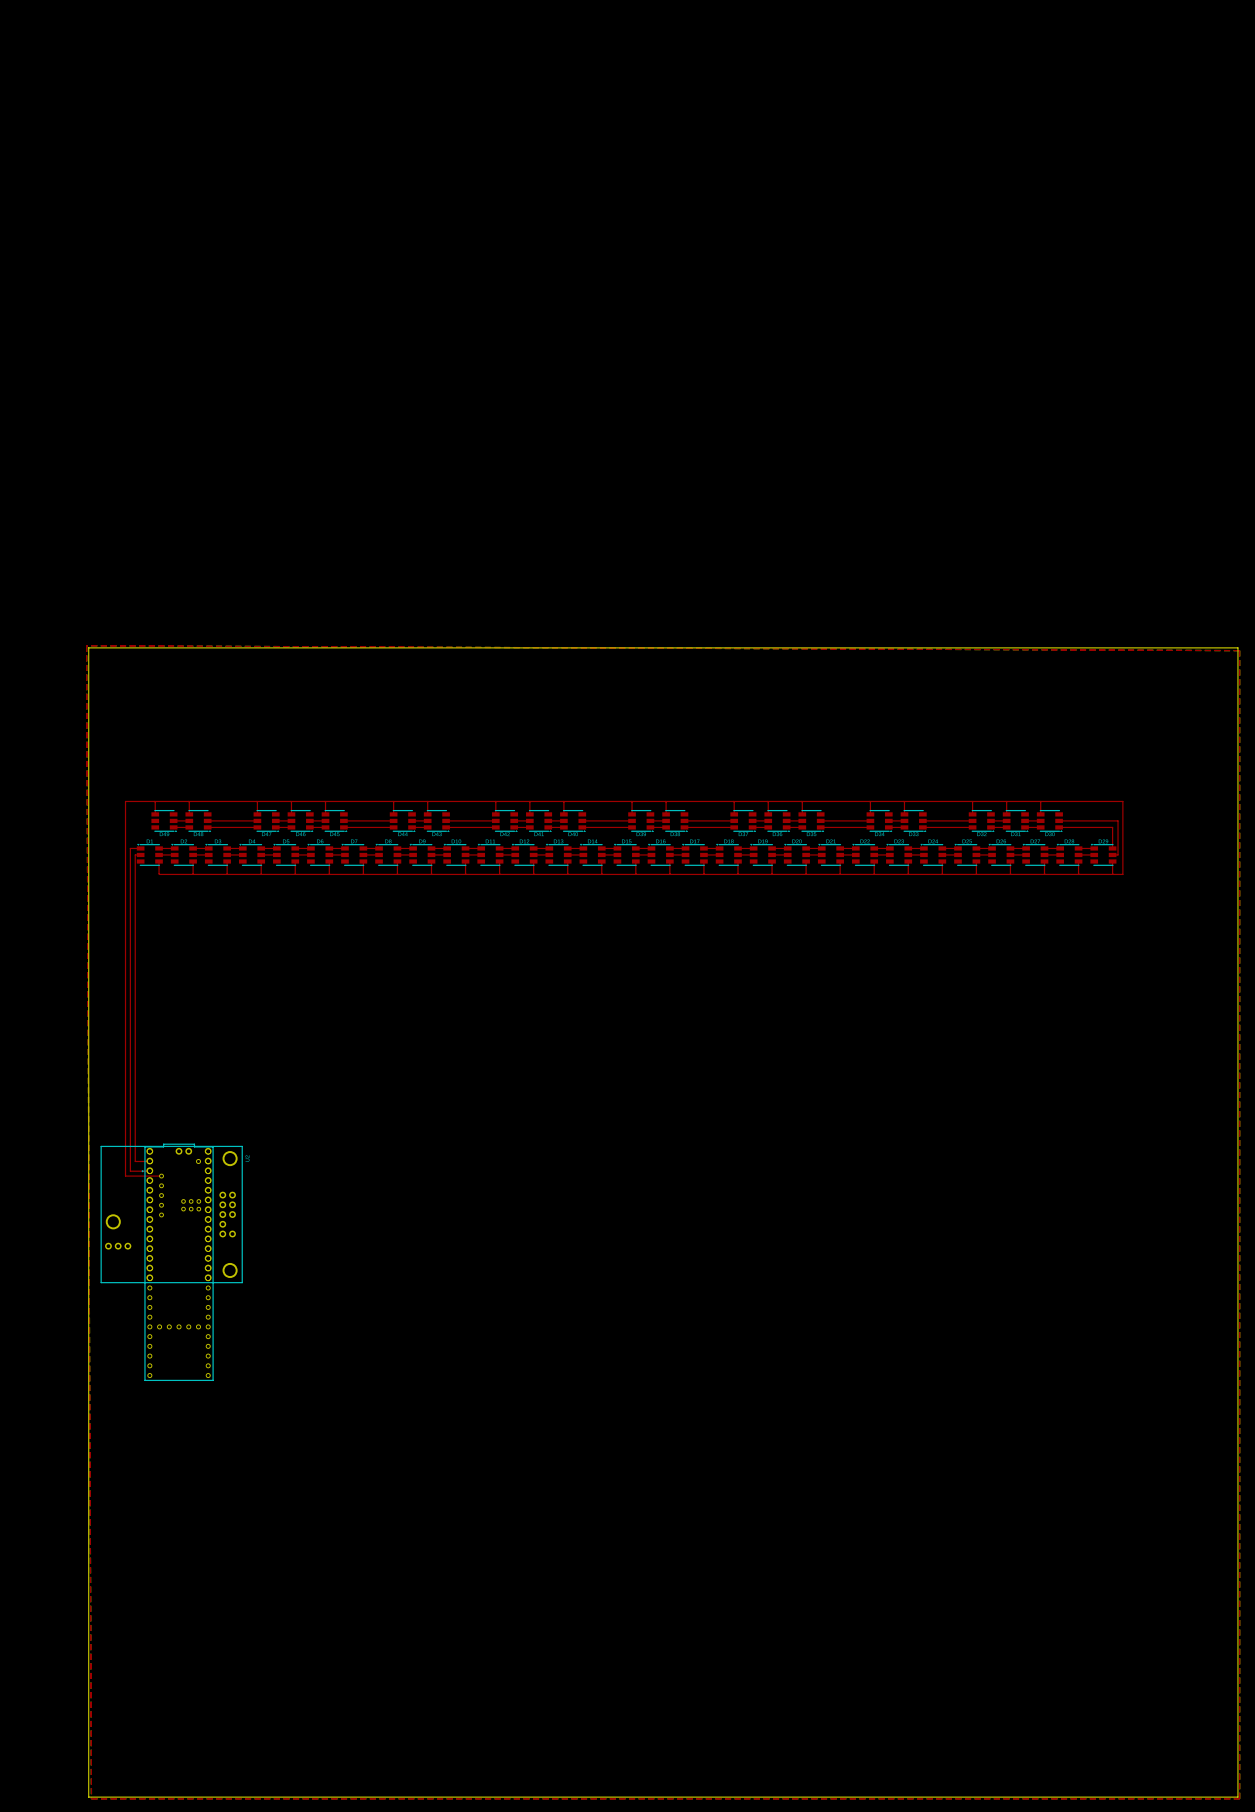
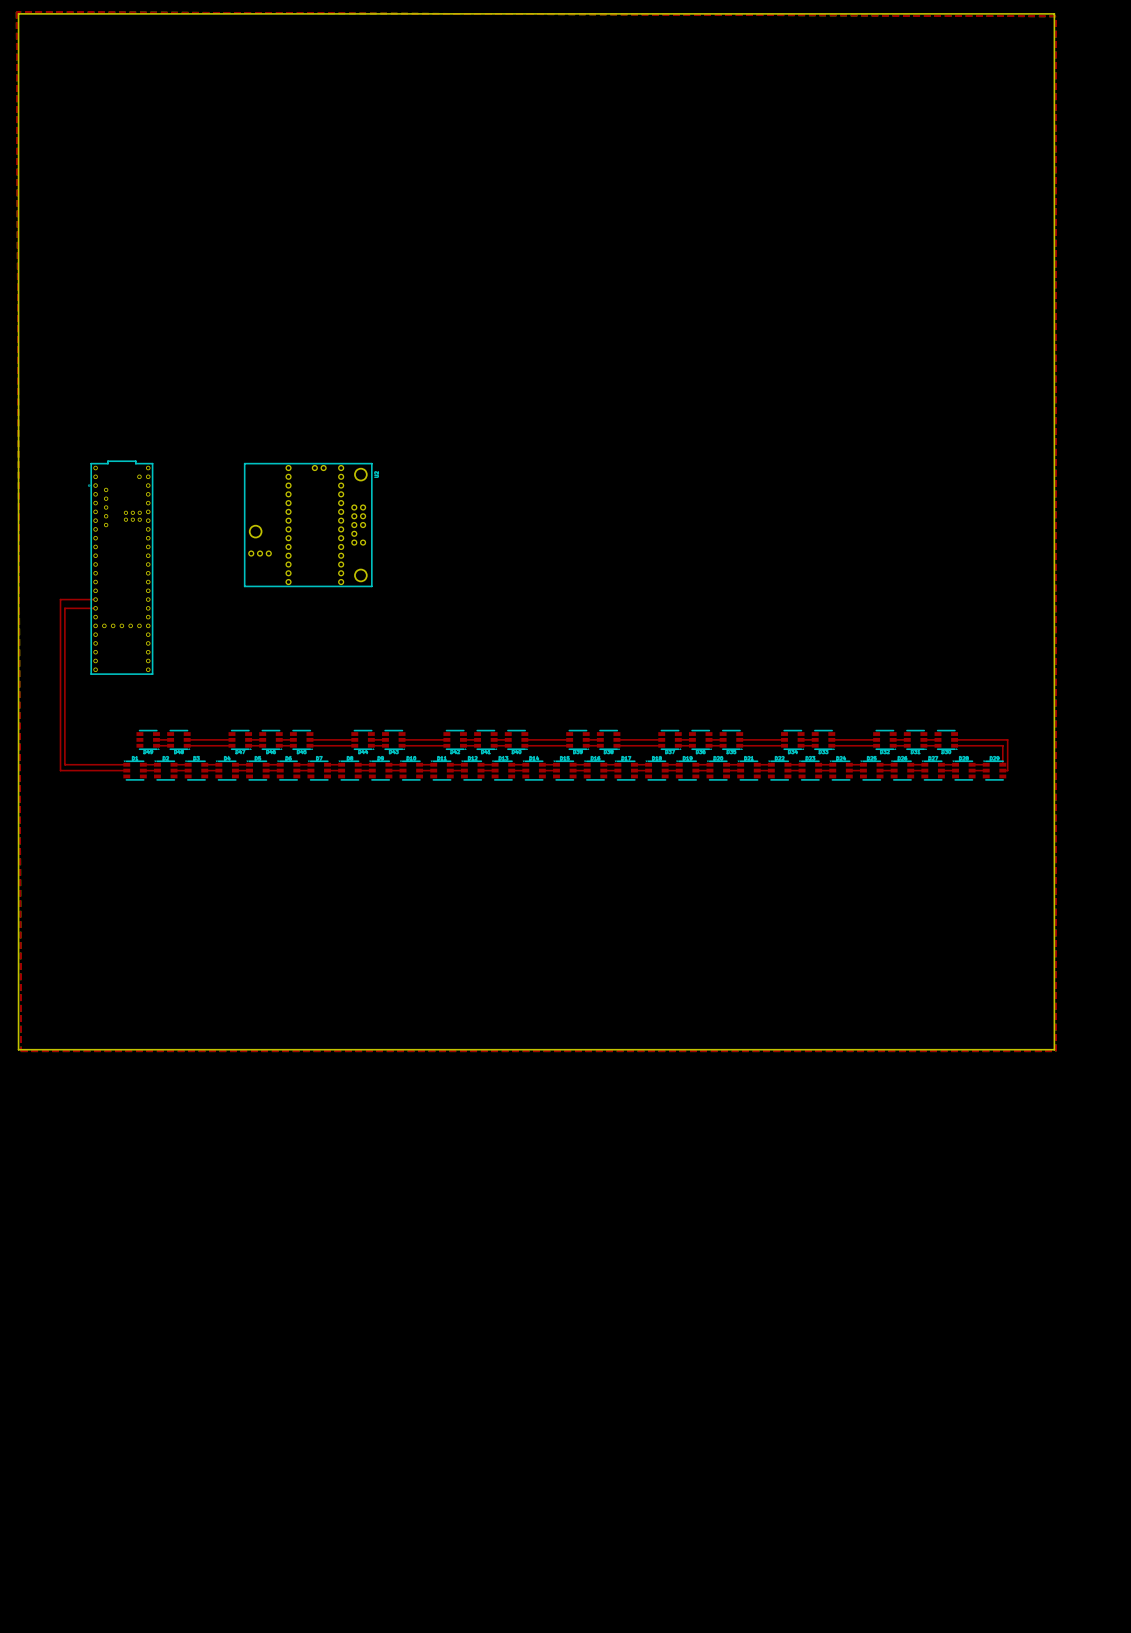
top zone outline: none -> (16, 11) (21, 1051) (1055, 1051) (1055, 16) (16, 11)
board edge: none -> (18, 13) (1054, 13) (1054, 1049) (18, 1049) (18, 13)
part: none -> (120, 567)
top zone outline: (86, 645) (91, 1798) (1239, 1798) (1239, 650) (86, 645) -> none
board edge: (88, 647) (1237, 647) (1237, 1797) (88, 1797) (88, 647) -> none
top track: (154, 801) (155, 814) -> none
top track: (188, 801) (189, 814) -> none
top track: (256, 801) (257, 814) -> none
top track: (290, 801) (291, 814) -> none
top track: (324, 801) (325, 814) -> none
top track: (393, 801) (393, 814) -> none
top track: (427, 801) (427, 814) -> none
top track: (495, 801) (495, 814) -> none
top track: (529, 801) (529, 814) -> none
top track: (563, 801) (563, 814) -> none
top track: (631, 801) (632, 814) -> none
top track: (665, 801) (666, 814) -> none
top track: (733, 801) (734, 814) -> none
top track: (767, 801) (768, 814) -> none
top track: (801, 801) (802, 814) -> none
top track: (869, 801) (870, 814) -> none
top track: (903, 801) (904, 814) -> none
top track: (972, 801) (972, 814) -> none
top track: (1006, 801) (1006, 814) -> none
top track: (1040, 801) (1040, 814) -> none
top track: (130, 848) (130, 1171) (149, 1171) -> (117, 764) (64, 764) (64, 608) (95, 608)
top track: (135, 854) (135, 1161) (149, 1161) -> (121, 770) (60, 770) (60, 599) (95, 599)
top track: (159, 861) (159, 874) (1122, 874) (1122, 801) (125, 801) (125, 1176) (161, 1176) -> none
top track: (193, 861) (193, 874) -> none
top track: (227, 861) (227, 874) -> none
top track: (261, 861) (261, 874) -> none
top track: (295, 861) (295, 874) -> none
top track: (329, 861) (329, 874) -> none
top track: (363, 861) (363, 874) -> none
top track: (397, 861) (397, 874) -> none
top track: (431, 861) (432, 874) -> none
top track: (465, 861) (466, 874) -> none
top track: (499, 861) (500, 874) -> none
top track: (533, 861) (534, 874) -> none
top track: (567, 861) (568, 874) -> none
top track: (601, 861) (602, 874) -> none
top track: (635, 861) (636, 874) -> none
top track: (669, 861) (670, 874) -> none
top track: (703, 861) (704, 874) -> none
top track: (737, 861) (738, 874) -> none
top track: (772, 861) (772, 874) -> none
top track: (806, 861) (806, 874) -> none
top track: (840, 861) (840, 874) -> none
top track: (874, 861) (874, 874) -> none
top track: (908, 861) (908, 874) -> none
top track: (942, 861) (942, 874) -> none
top track: (976, 861) (976, 874) -> none
top track: (1010, 861) (1010, 874) -> none
top track: (1044, 861) (1045, 874) -> none
top track: (1078, 861) (1079, 874) -> none
top track: (1112, 861) (1113, 874) -> none
part position: (171, 1214) -> (308, 525)
part: (177, 1262) -> none

